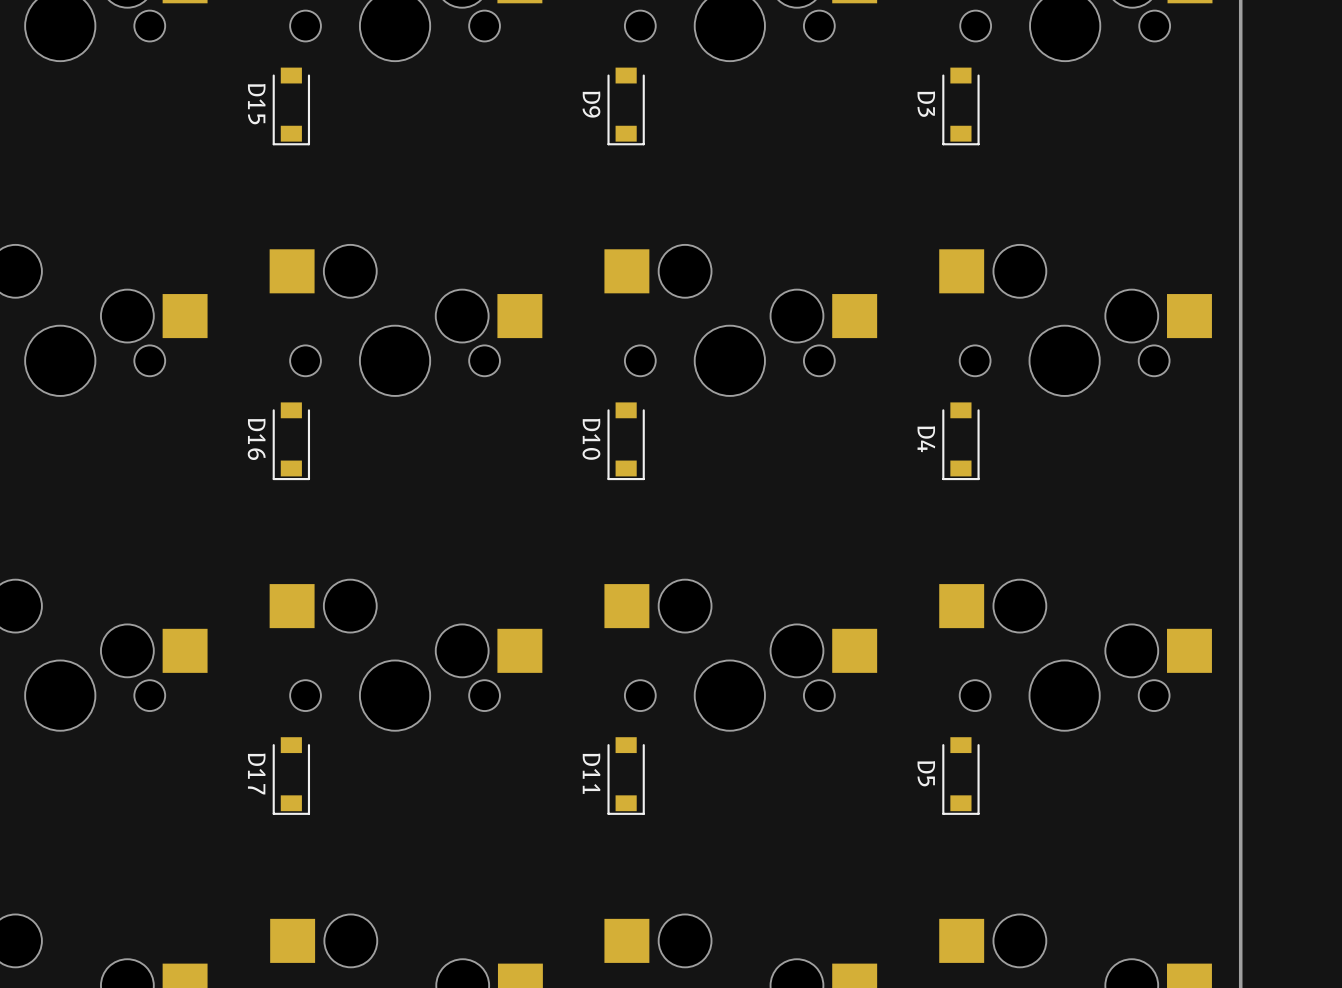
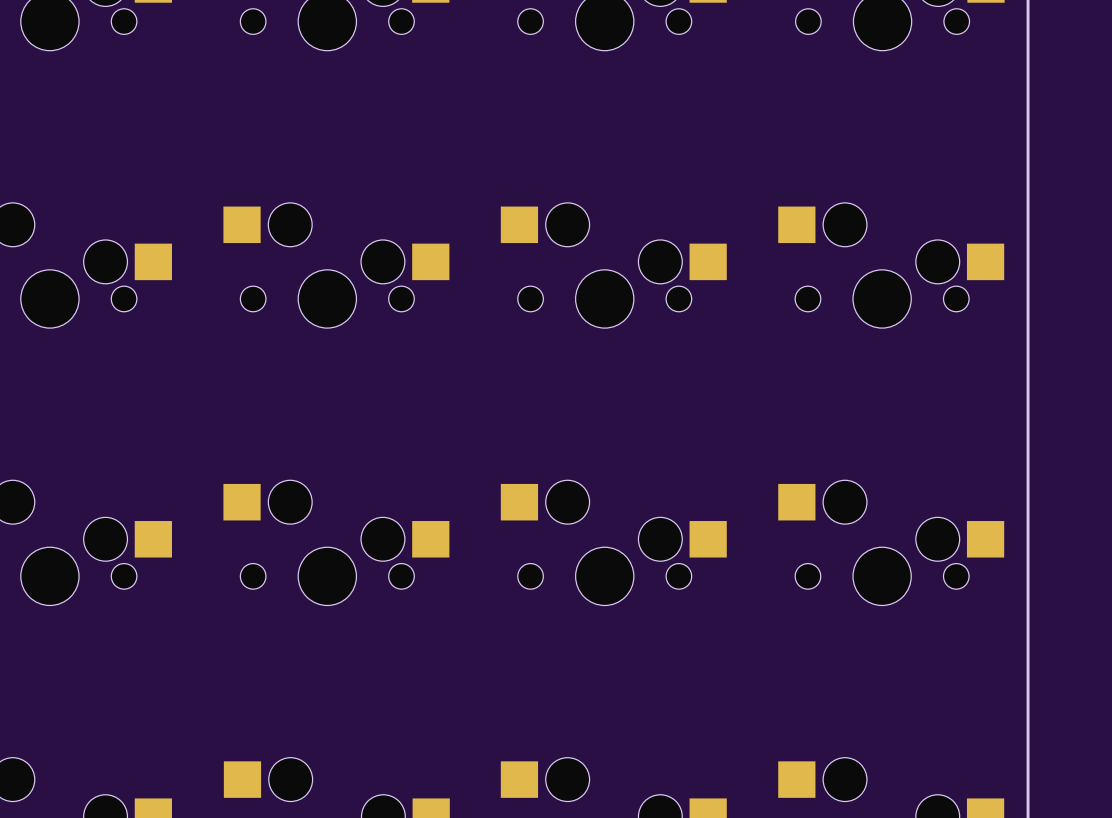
D15: (291, 106) -> none
D9: (626, 106) -> none
D3: (960, 106) -> none
D16: (291, 441) -> none
D10: (626, 441) -> none
D4: (960, 441) -> none
D17: (291, 776) -> none
D11: (626, 776) -> none
D5: (960, 776) -> none

